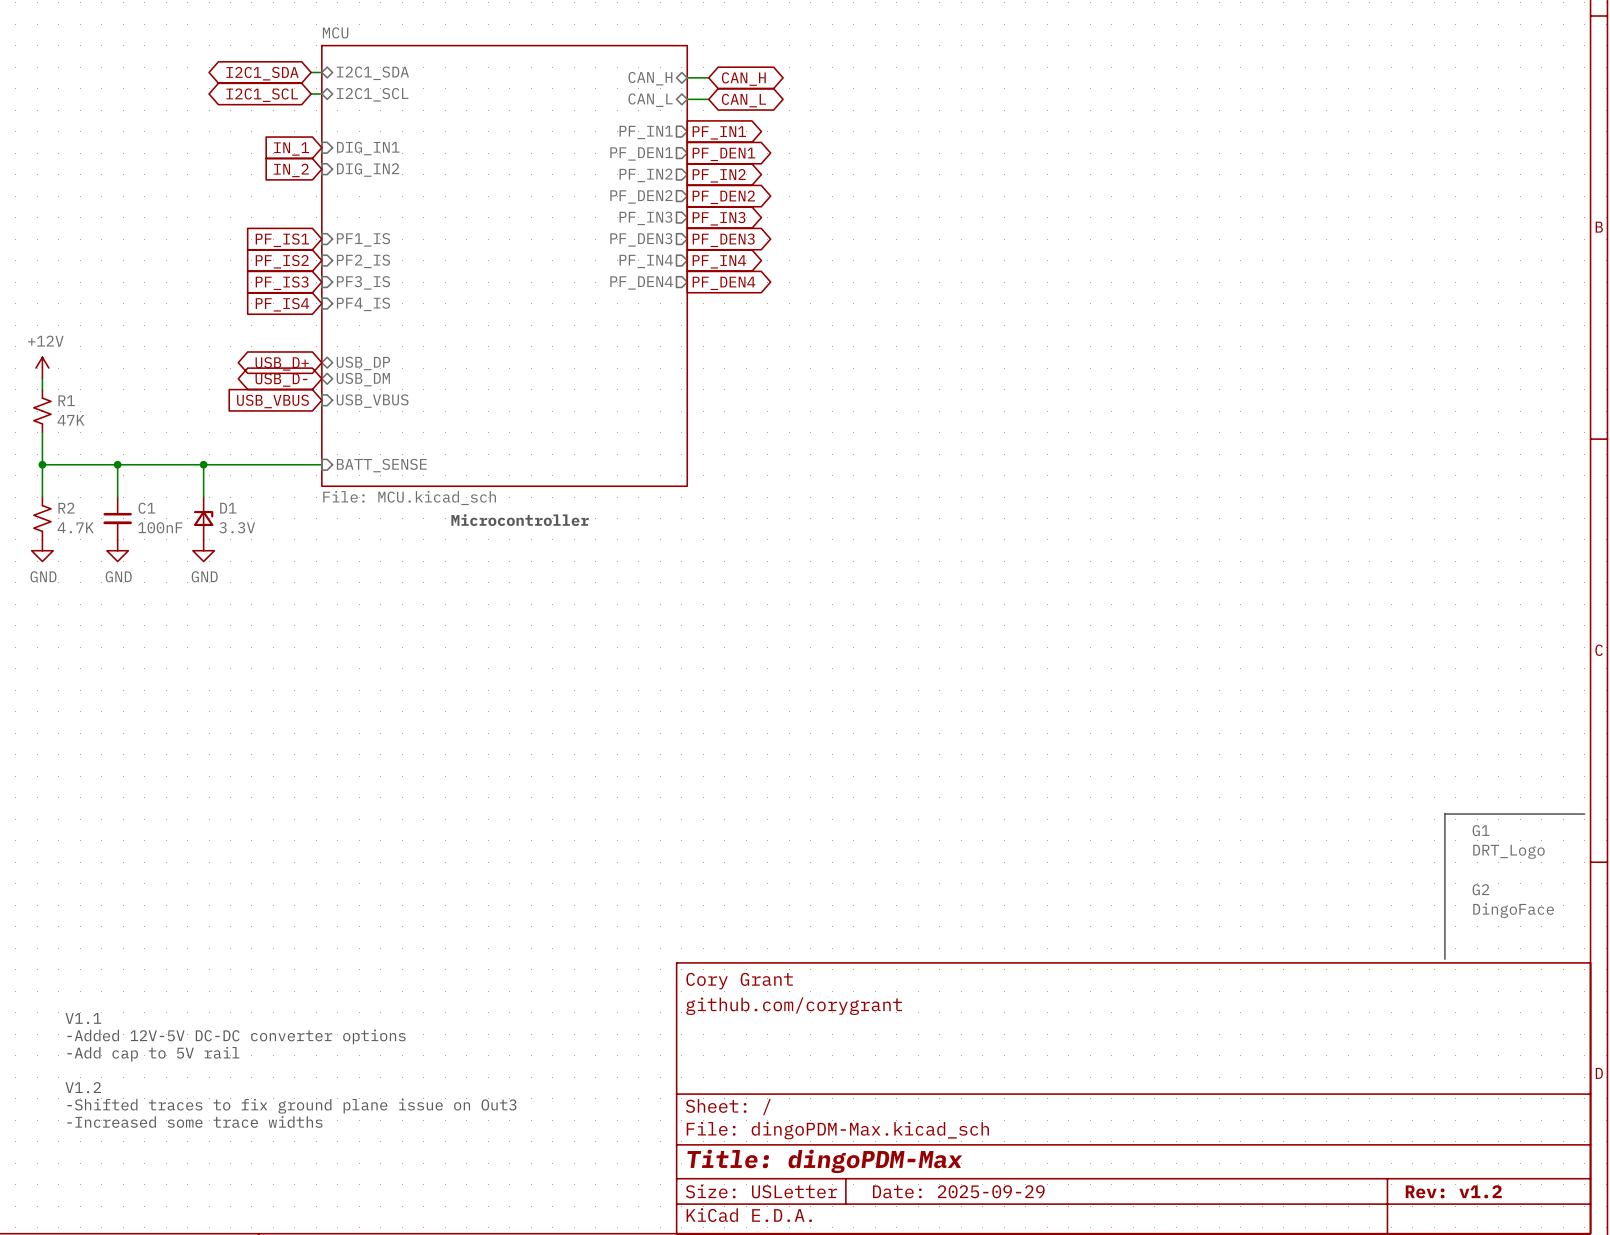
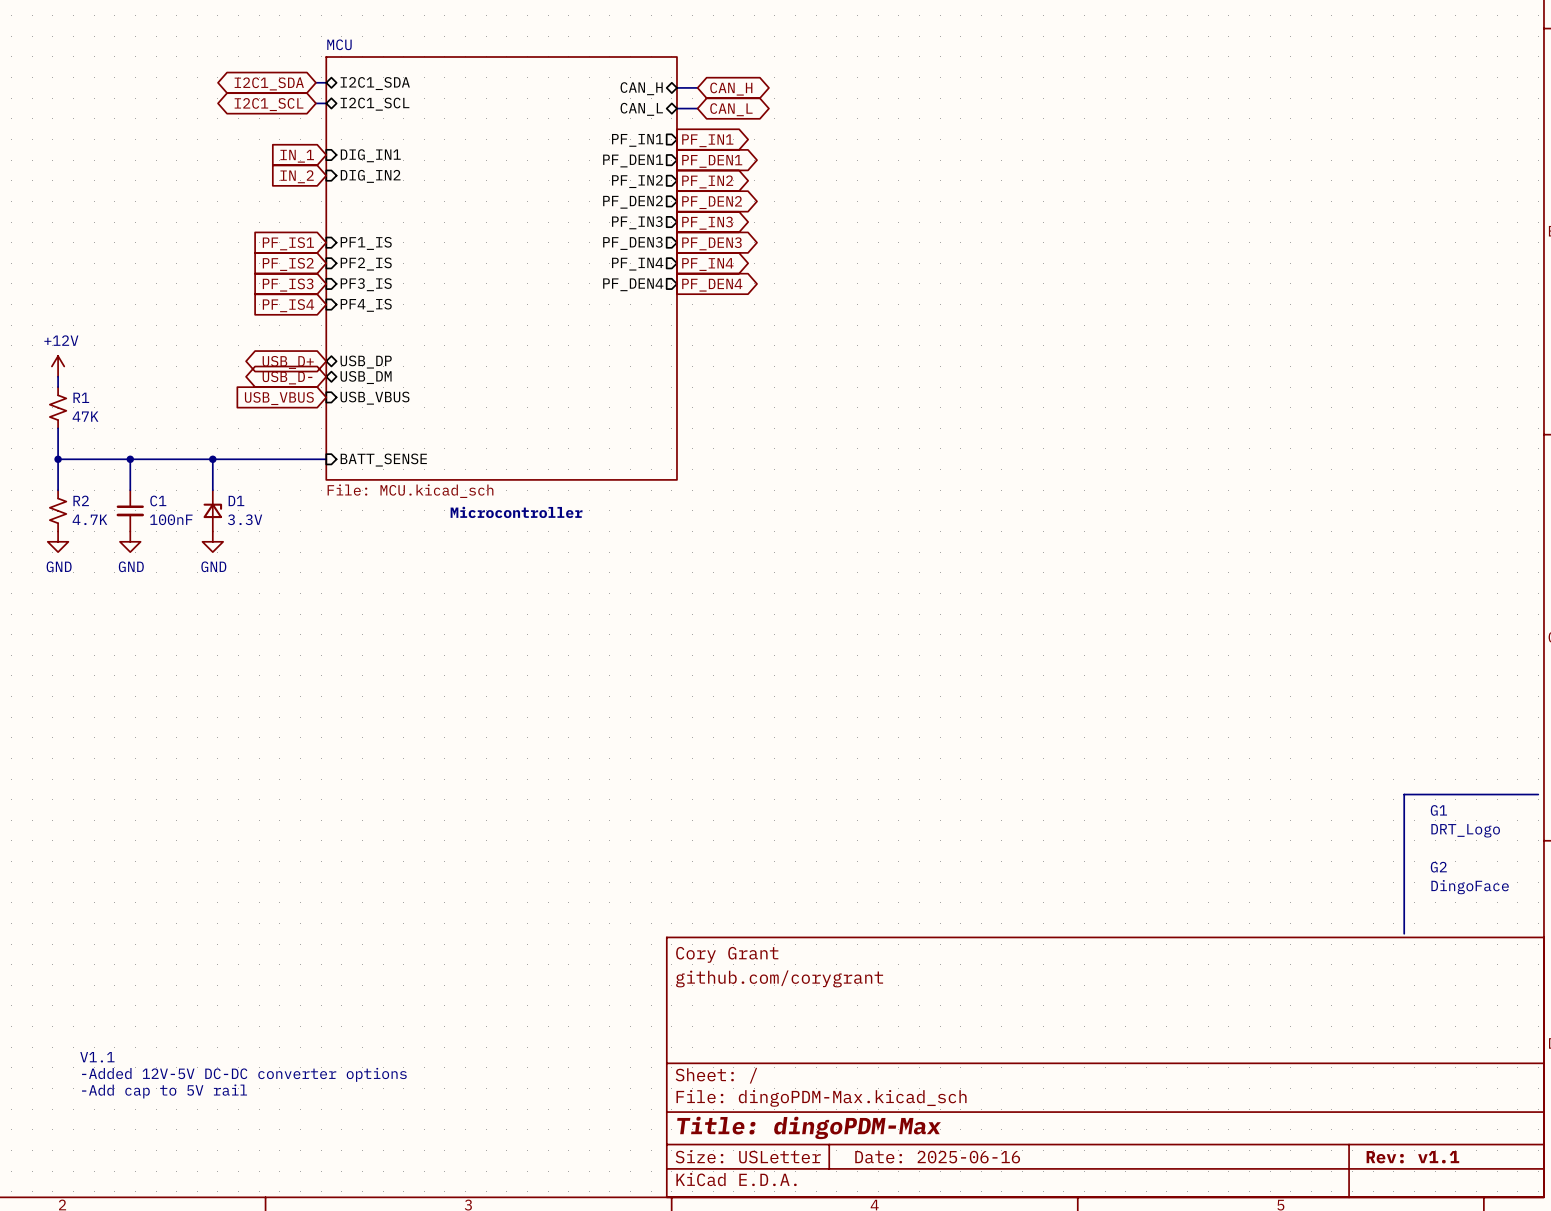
text: V1.1 (83, 1018) -> none
text: -Added 12V-5V DC-DC converter options (236, 1036) -> none
text: -Add cap to 5V rail (153, 1054) -> none
text: V1.2 (83, 1087) -> V1.1 (97, 1057)
text: -Shifted traces to fix ground plane issue on Out3 (291, 1106) -> -Added 12V-5V DC-DC converter options (244, 1074)
text: -Increased some trace widths (194, 1121) -> -Add cap to 5V rail (164, 1091)
title block: Date: 2025-09-29 (958, 1191) -> Date: 2025-06-16 (937, 1157)
title block: Rev: v1.2 (1453, 1191) -> Rev: v1.1 (1412, 1157)

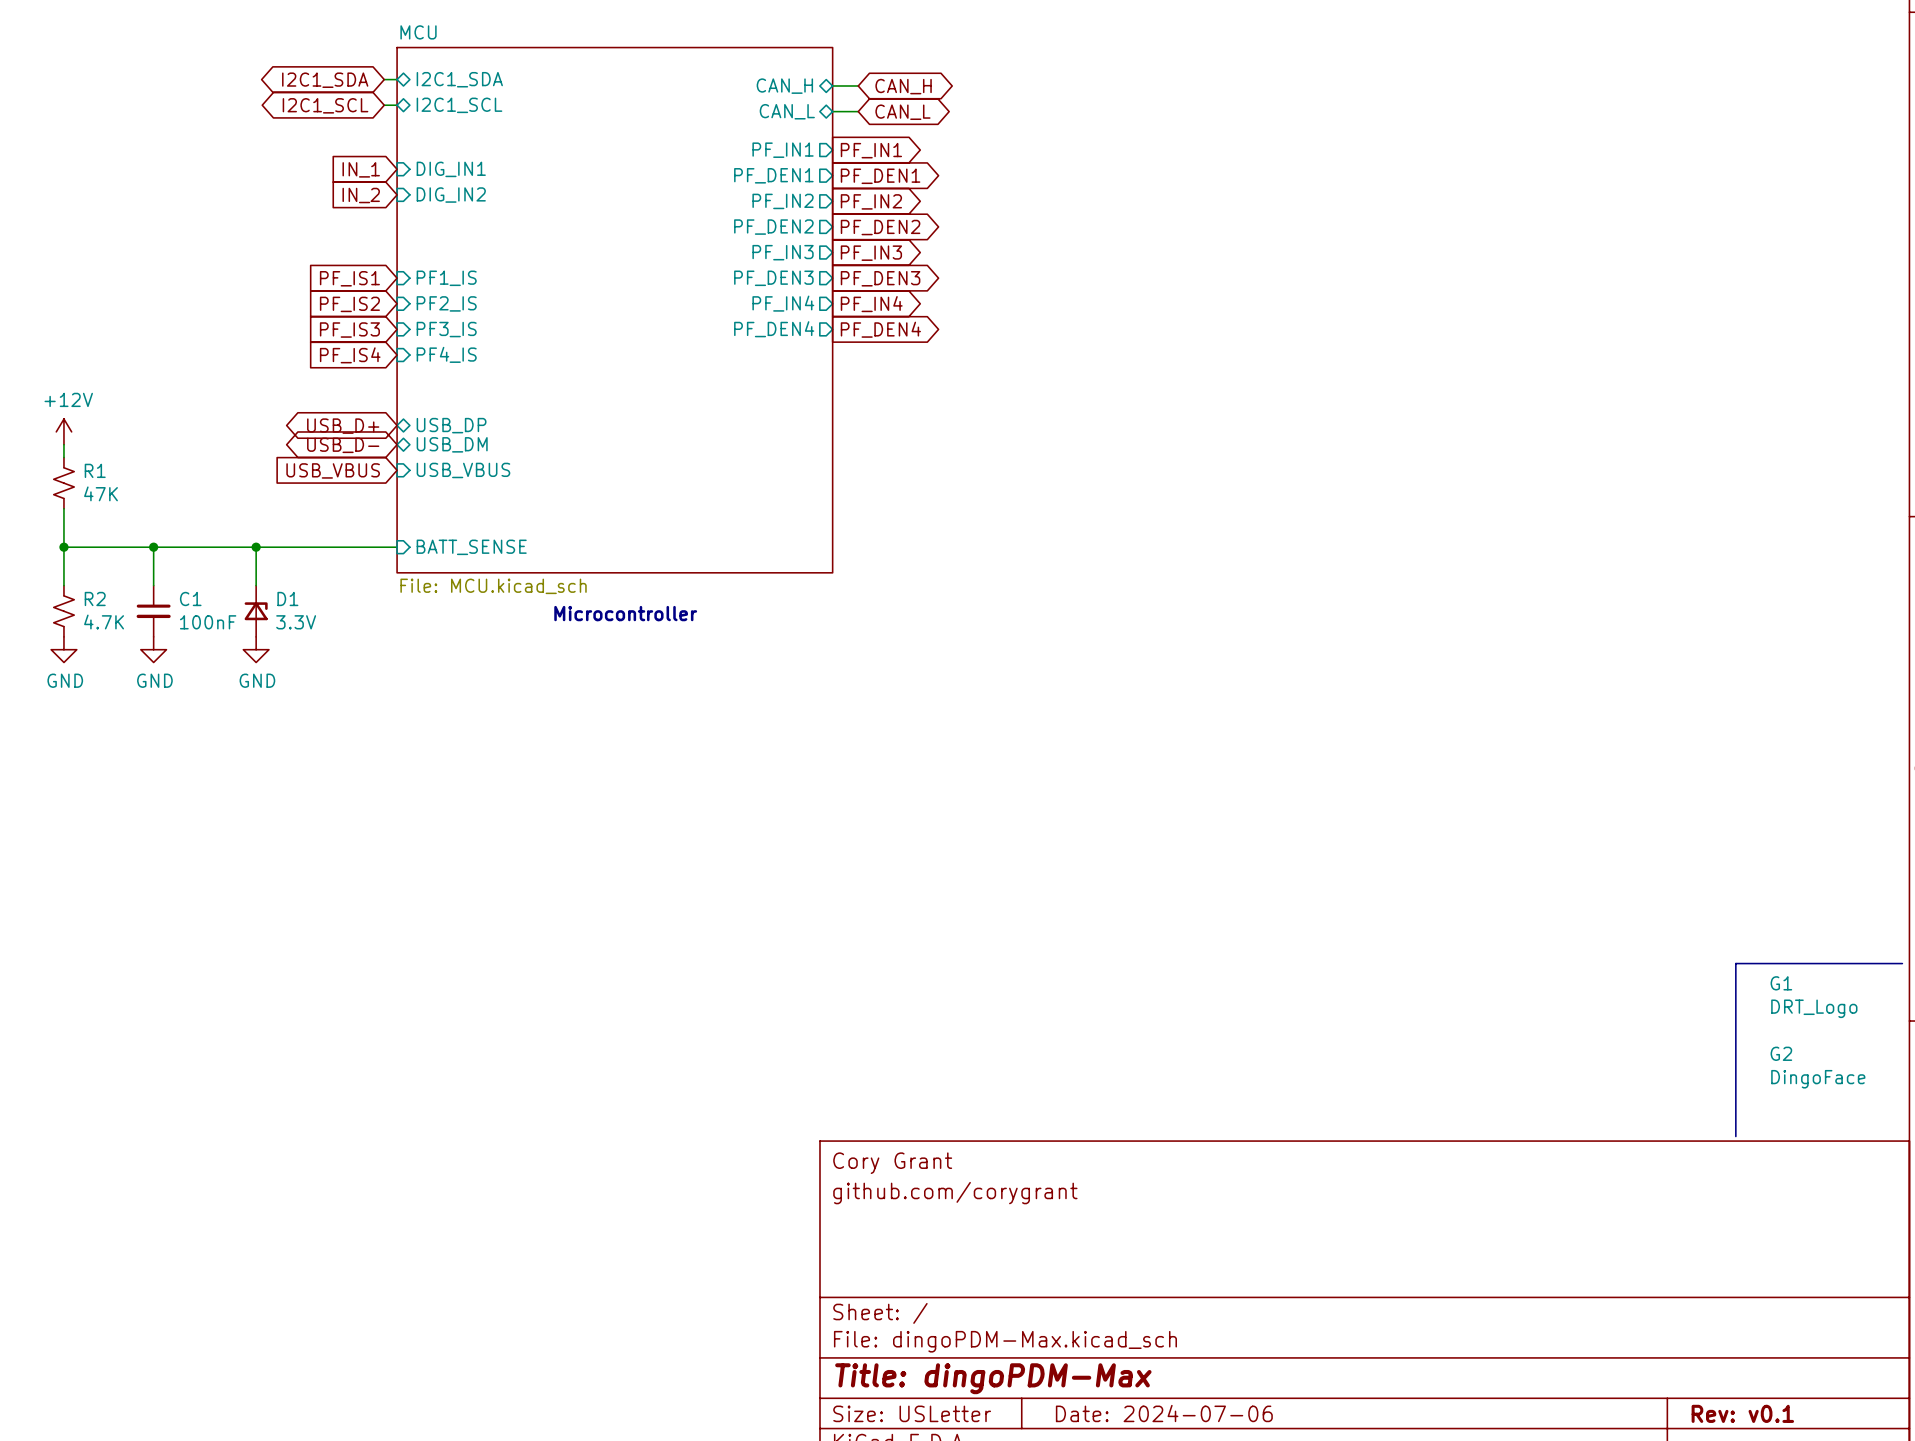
text: V1.1 (97, 1057) -> none
text: -Added 12V-5V DC-DC converter options (244, 1074) -> none
text: -Add cap to 5V rail (164, 1091) -> none
title block: Date: 2025-06-16 (937, 1157) -> Date: 2024-07-06 (1164, 1413)
title block: Rev: v1.1 (1412, 1157) -> Rev: v0.1 (1742, 1413)

